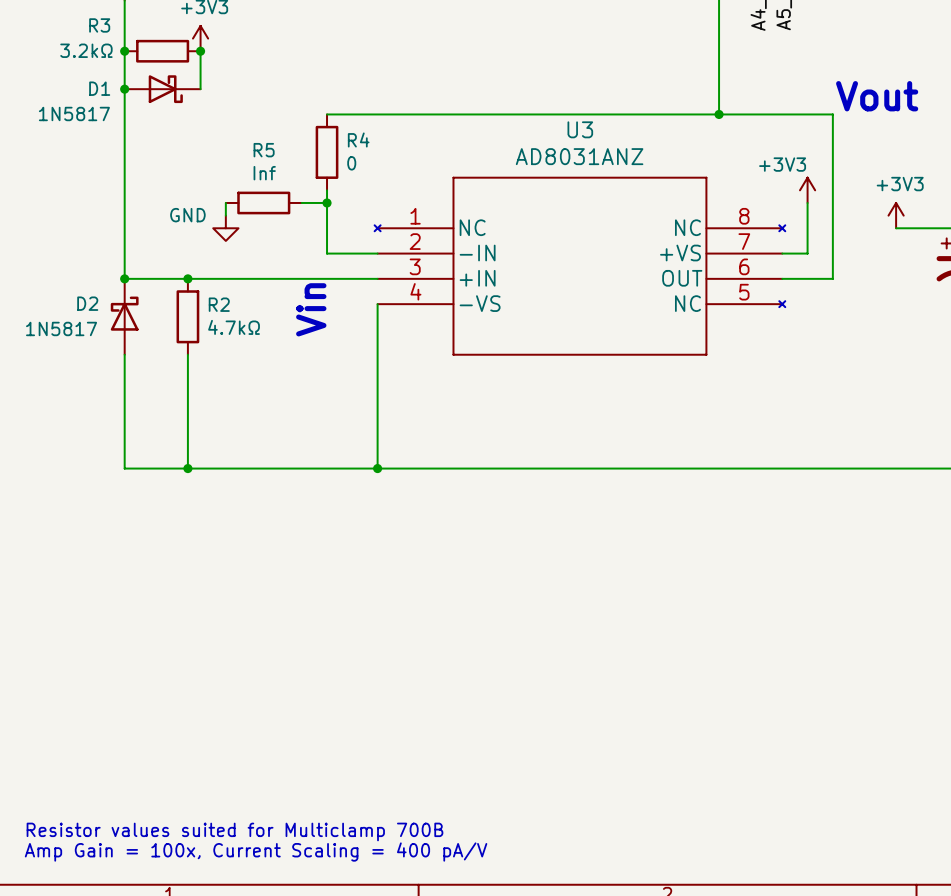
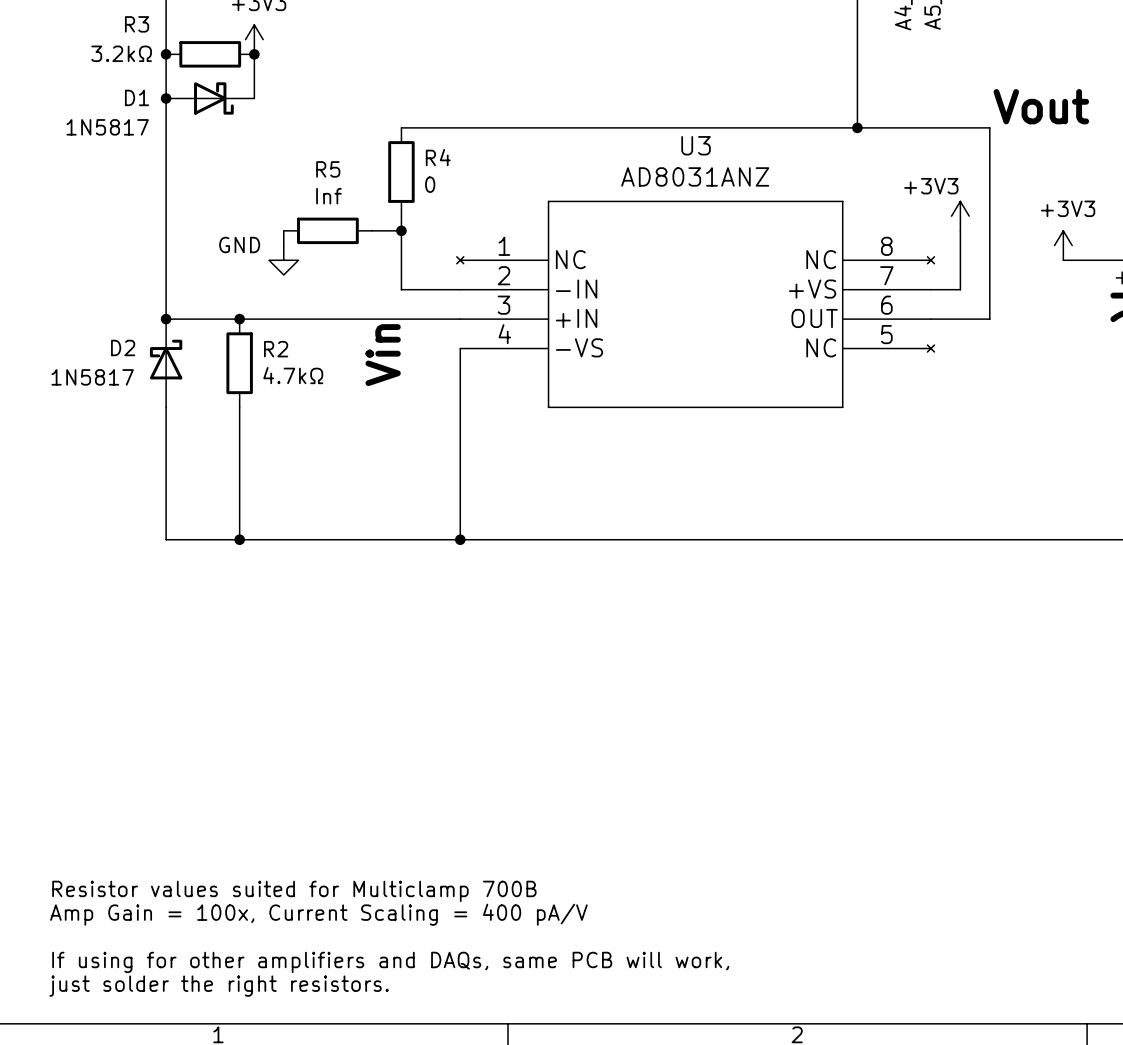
text: none -> Resistor values suited for Multiclamp 700B (294, 891)
text: none -> Amp Gain = 100x, Current Scaling = 400 pA/V (318, 914)
text: Resistor values suited for Multiclamp 700B (234, 831) -> If using for other amplifiers and DAQs, same PCB will work, (390, 962)
text: Amp Gain = 100x, Current Scaling = 400 pA/V (256, 852) -> just solder the right resistors. (219, 986)

